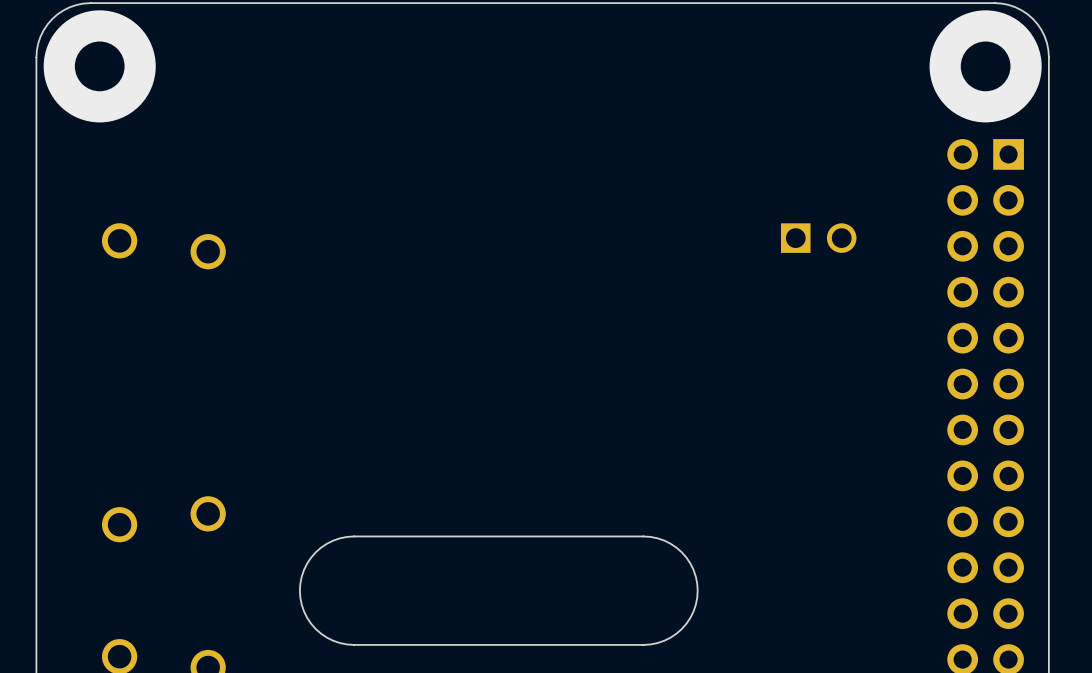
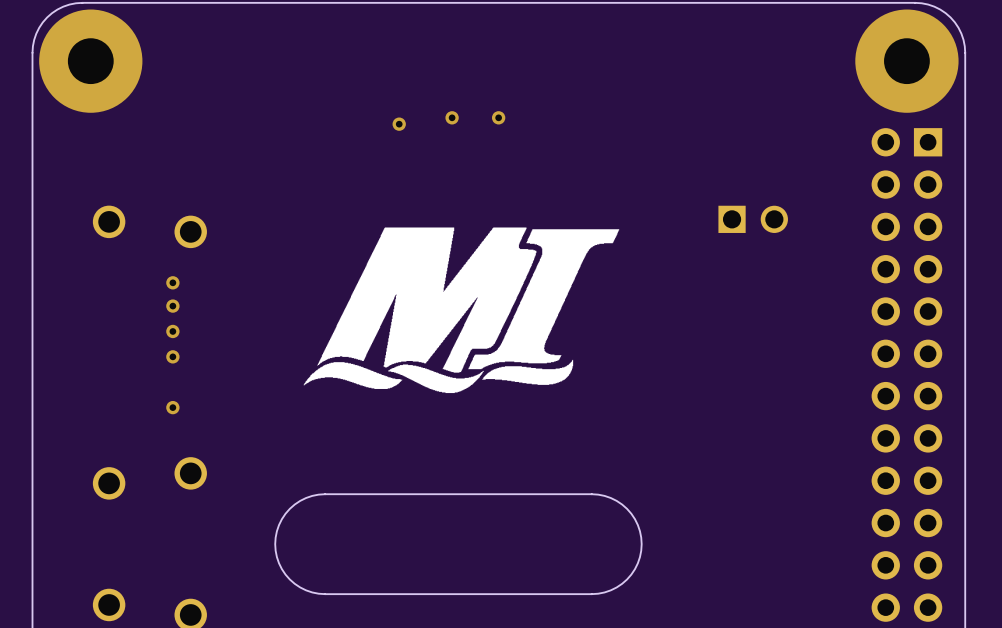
via: none -> (452, 117)
via: none -> (498, 117)
via: none -> (399, 124)
drawing: none -> [303, 227, 620, 394]
via: none -> (172, 282)
via: none -> (172, 306)
via: none -> (172, 331)
via: none -> (172, 356)
via: none -> (172, 407)

